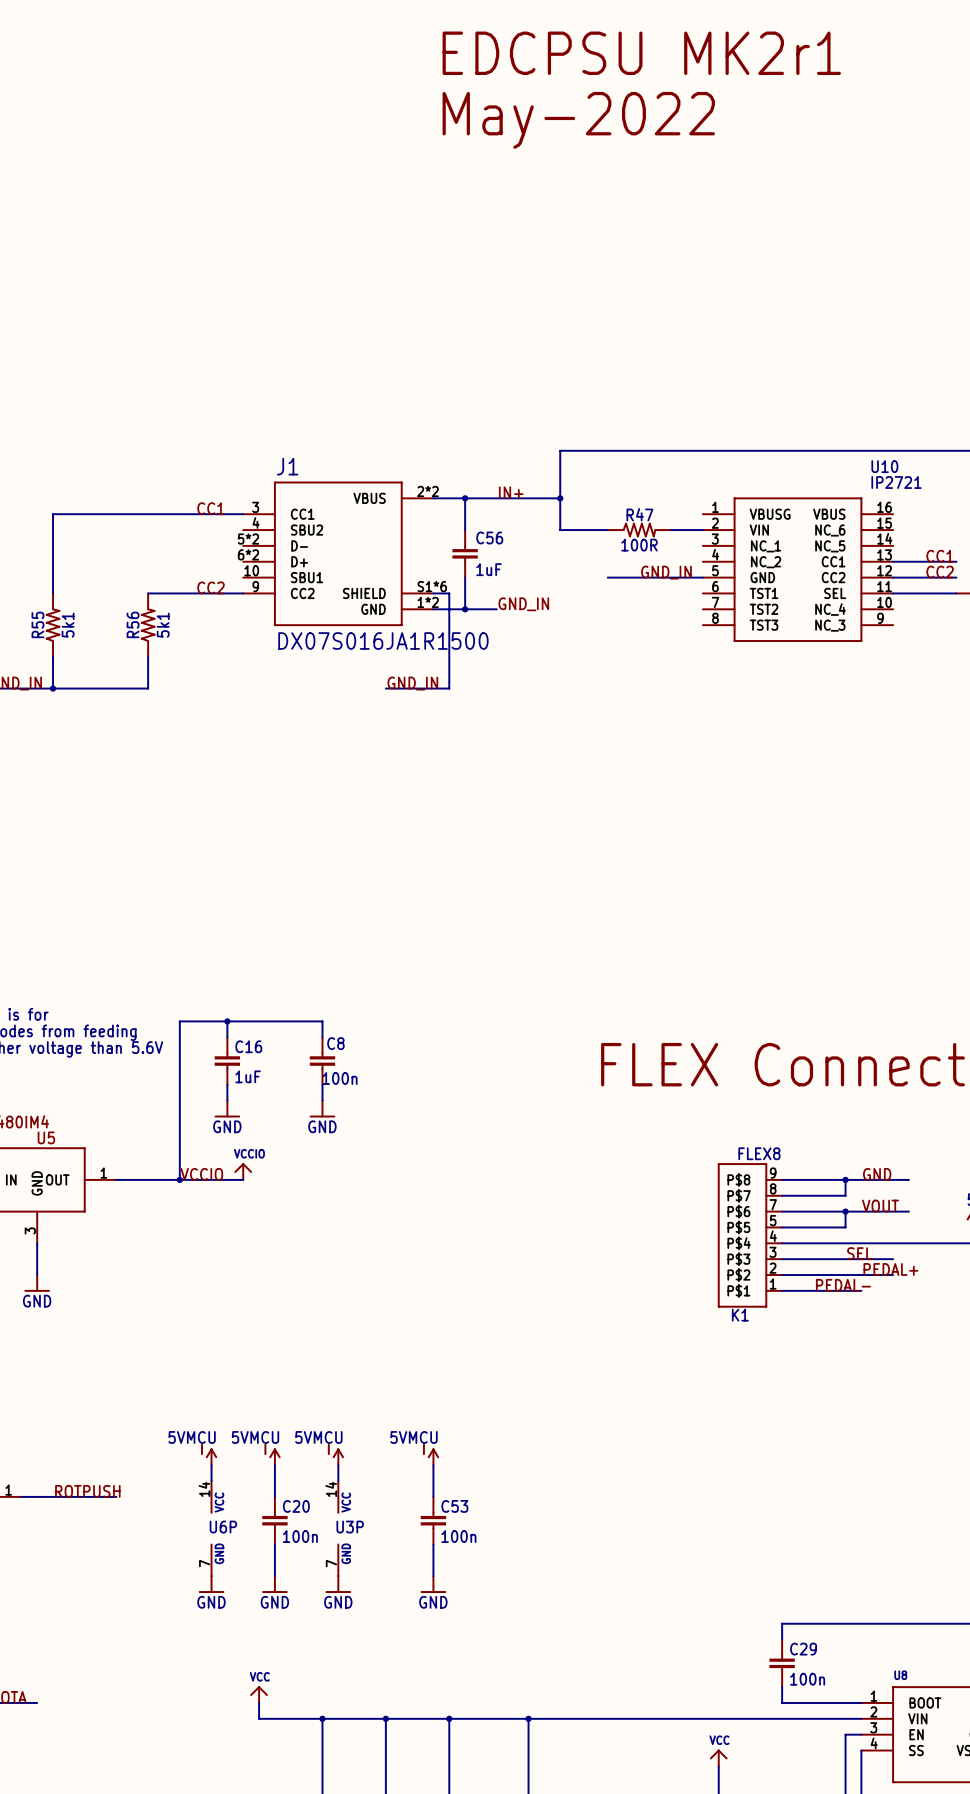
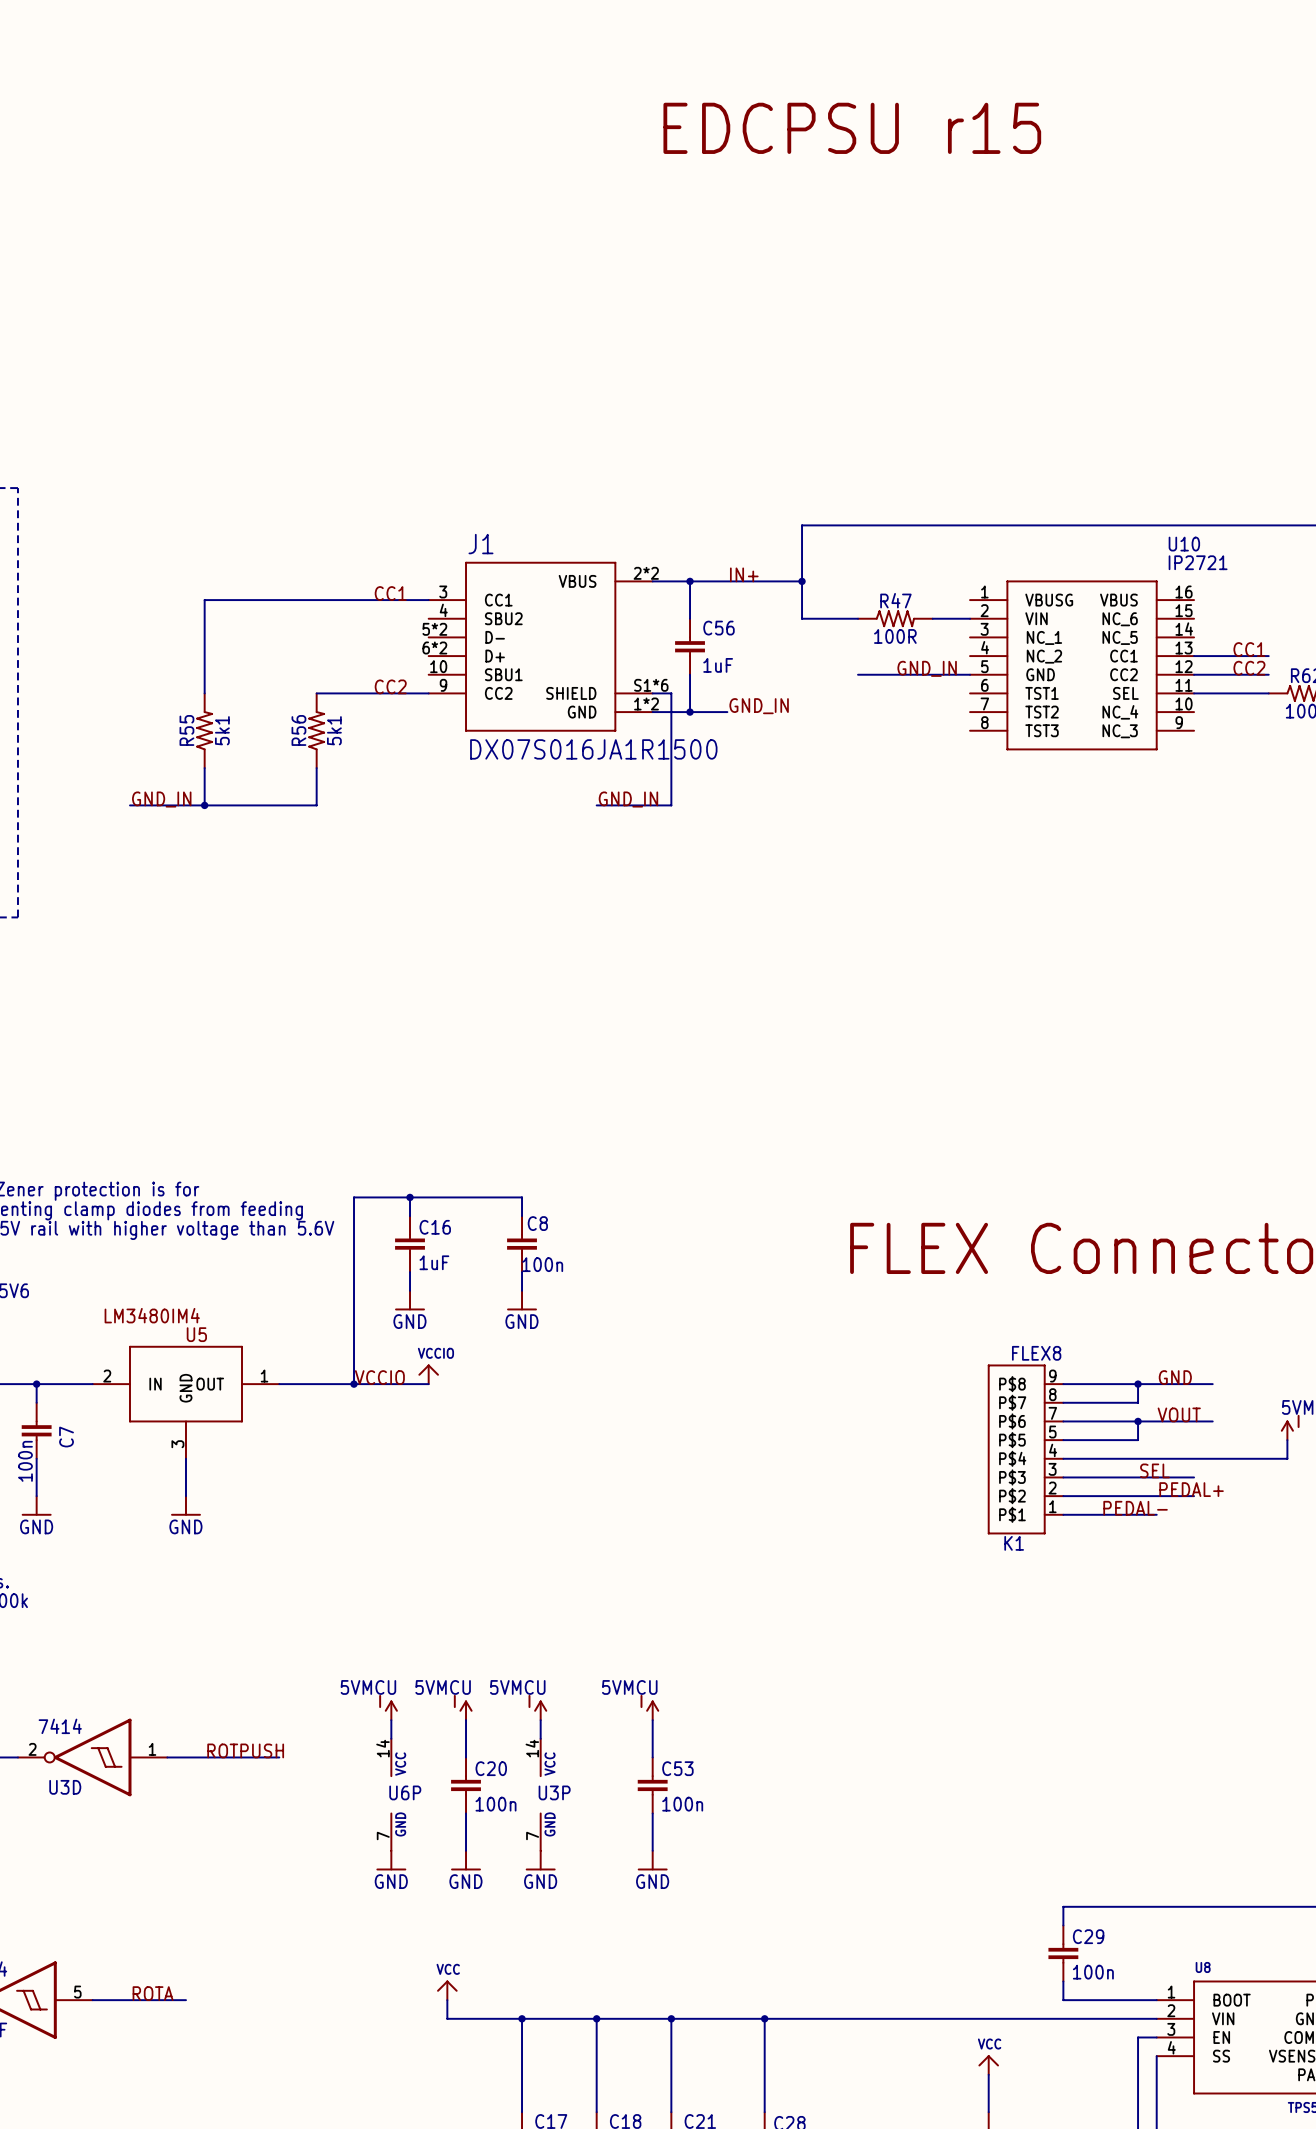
text: EDCPSU MK2r1 (641, 53) -> none
text: May-2022 (578, 120) -> EDCPSU r15 (852, 128)

